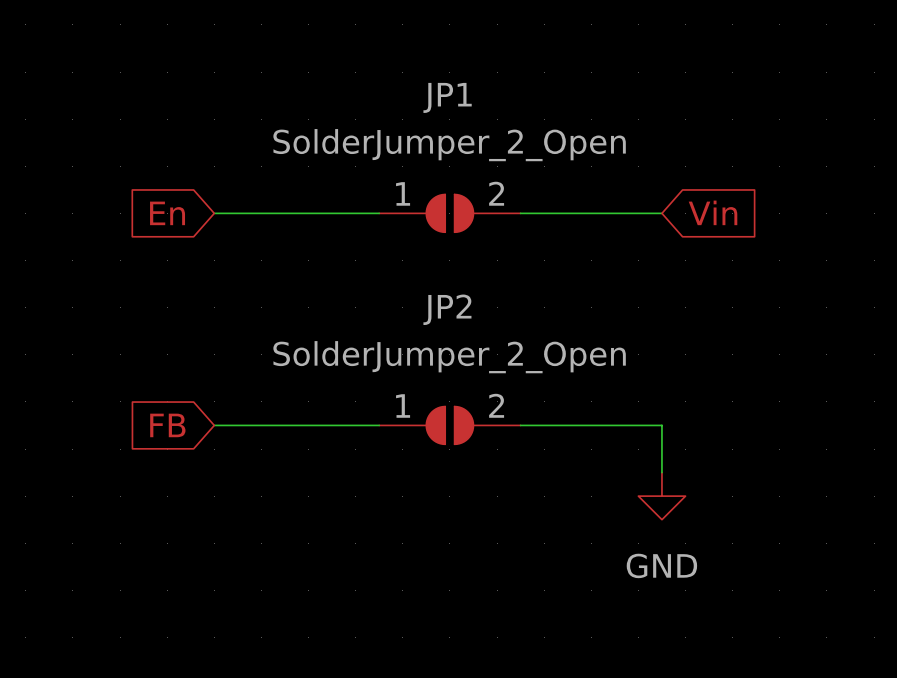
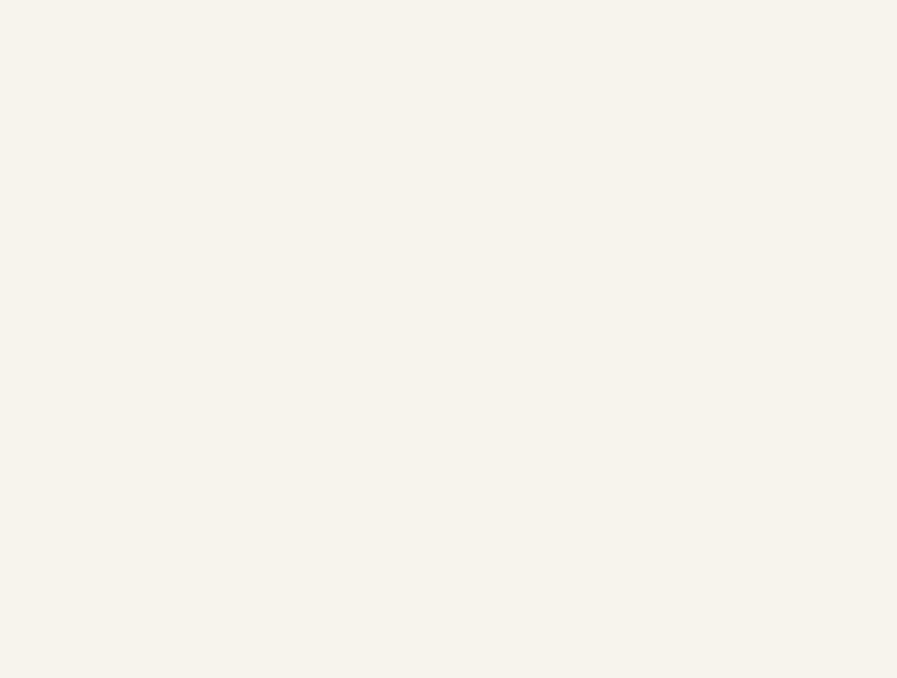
global label: Vin (713, 212) -> none
global label: En (167, 213) -> none
wire: (214, 213) (379, 213) -> none
JP1: SolderJumper_2_Open (449, 213) -> none
wire: (520, 213) (661, 213) -> none
global label: FB (167, 425) -> none
wire: (214, 425) (379, 425) -> none
JP2: SolderJumper_2_Open (449, 425) -> none
wire: (520, 425) (661, 425) (661, 472) -> none
power symbol: GND (661, 496) -> none

